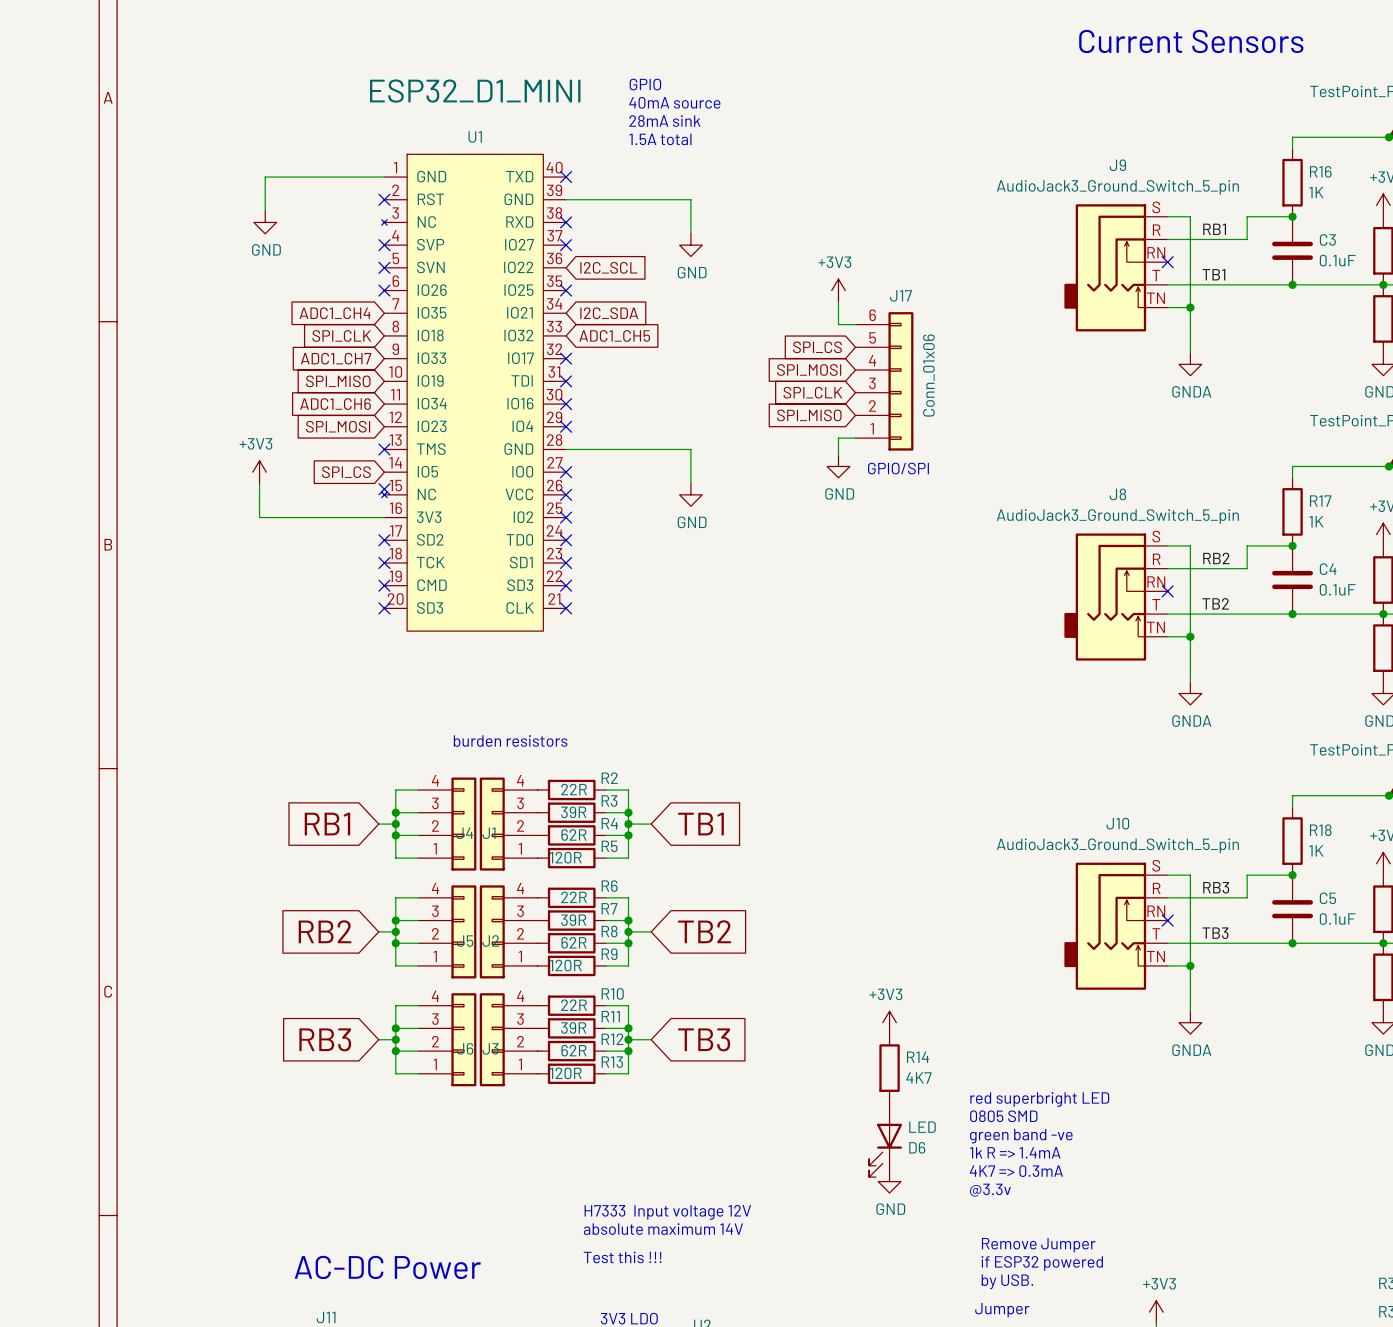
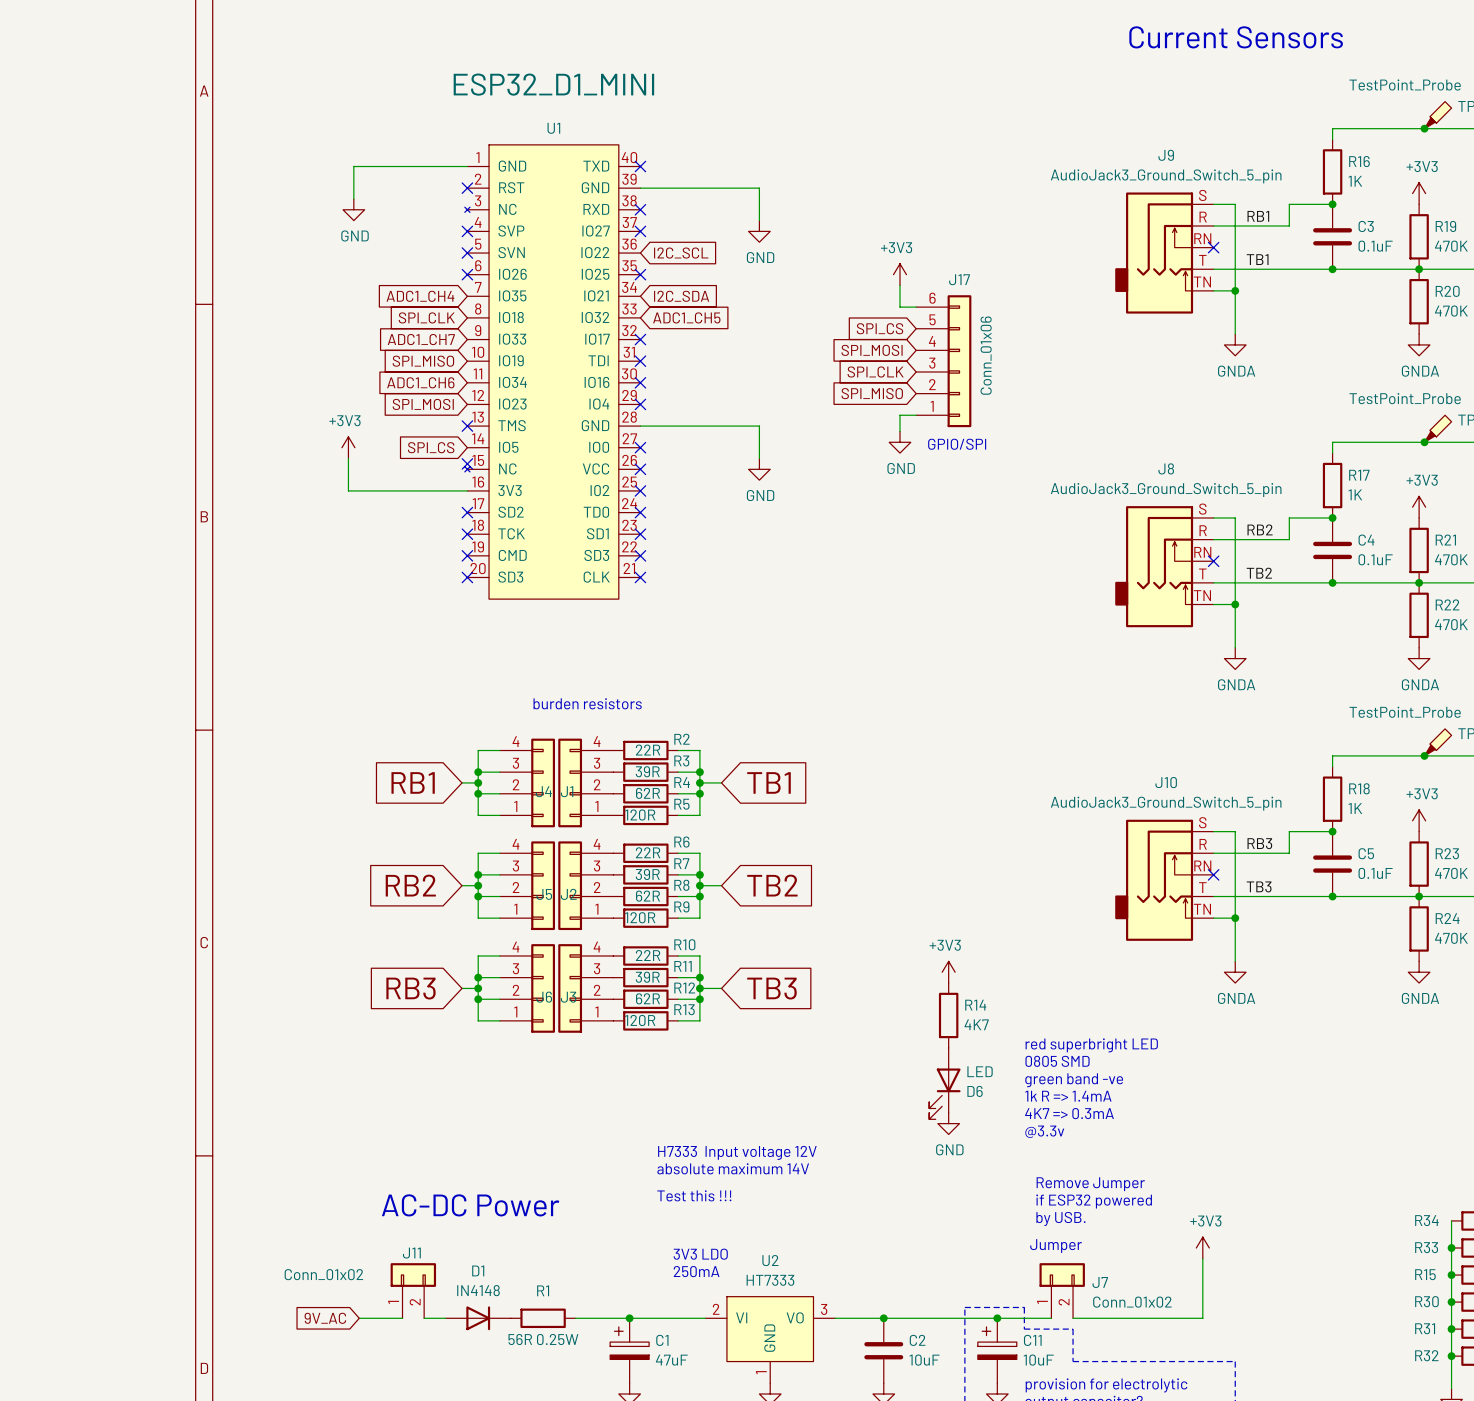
text: GPIO (645, 84) -> none
text: 40mA source (674, 102) -> none
text: 28mA sink (664, 121) -> none
text: 1.5A total (660, 139) -> none

